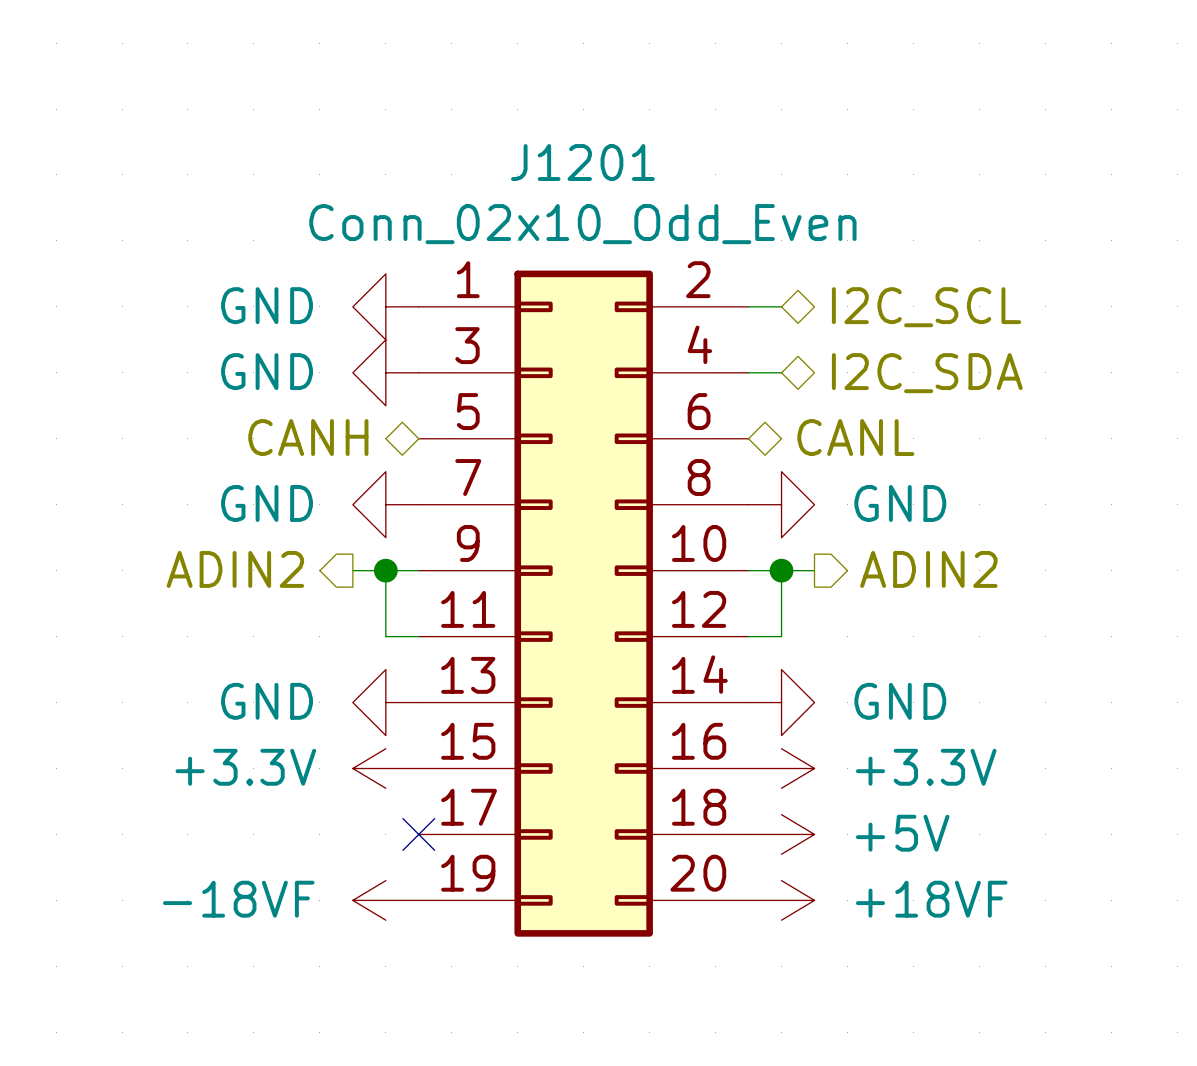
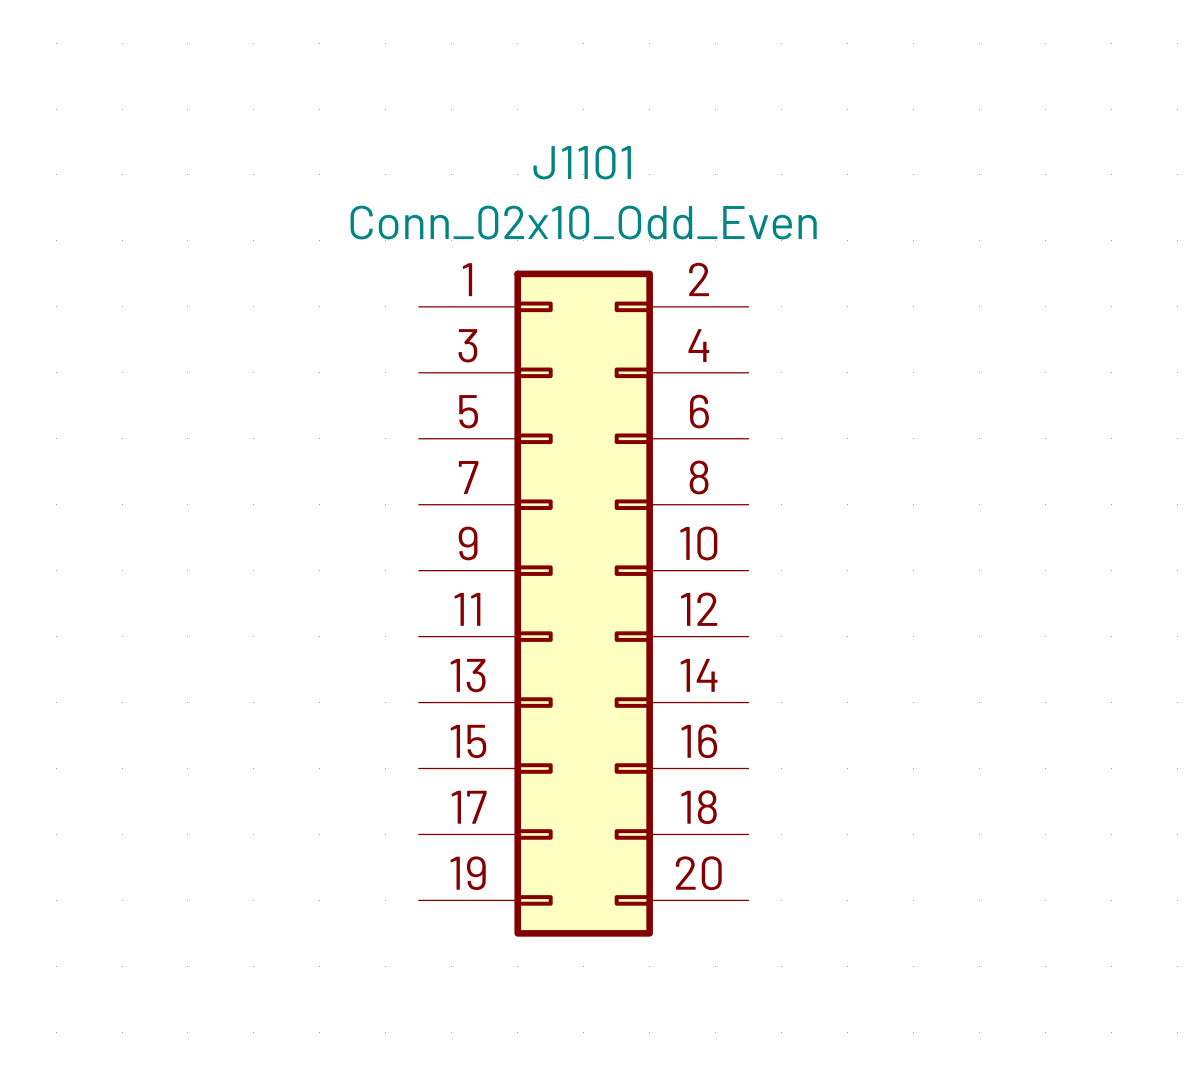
J1201 name: J1201 (582, 162) -> J1101 (582, 162)
power symbol: GND (385, 306) -> none
wire: (748, 306) (781, 306) -> none
hierarchical label: I2C_SCL (926, 307) -> none
power symbol: GND (385, 372) -> none
wire: (748, 372) (781, 372) -> none
hierarchical label: I2C_SDA (927, 373) -> none
hierarchical label: CANH (308, 437) -> none
hierarchical label: CANL (855, 437) -> none
power symbol: GND (385, 504) -> none
power symbol: GND (781, 504) -> none
hierarchical label: ADIN2 (235, 569) -> none
hierarchical label: ADIN2 (928, 569) -> none
wire: (352, 570) (418, 570) -> none
wire: (385, 570) (385, 636) (418, 636) -> none
junction: (385, 570) -> none
wire: (748, 570) (814, 570) -> none
wire: (781, 570) (781, 636) (748, 636) -> none
junction: (781, 570) -> none
power symbol: GND (385, 702) -> none
power symbol: GND (781, 702) -> none
power symbol: +3.3V (385, 768) -> none
power symbol: +3.3V (781, 768) -> none
no-connect mark: (418, 834) -> none
power symbol: +5V (781, 834) -> none
power symbol: -18VF (385, 900) -> none
power symbol: +18VF (781, 900) -> none

